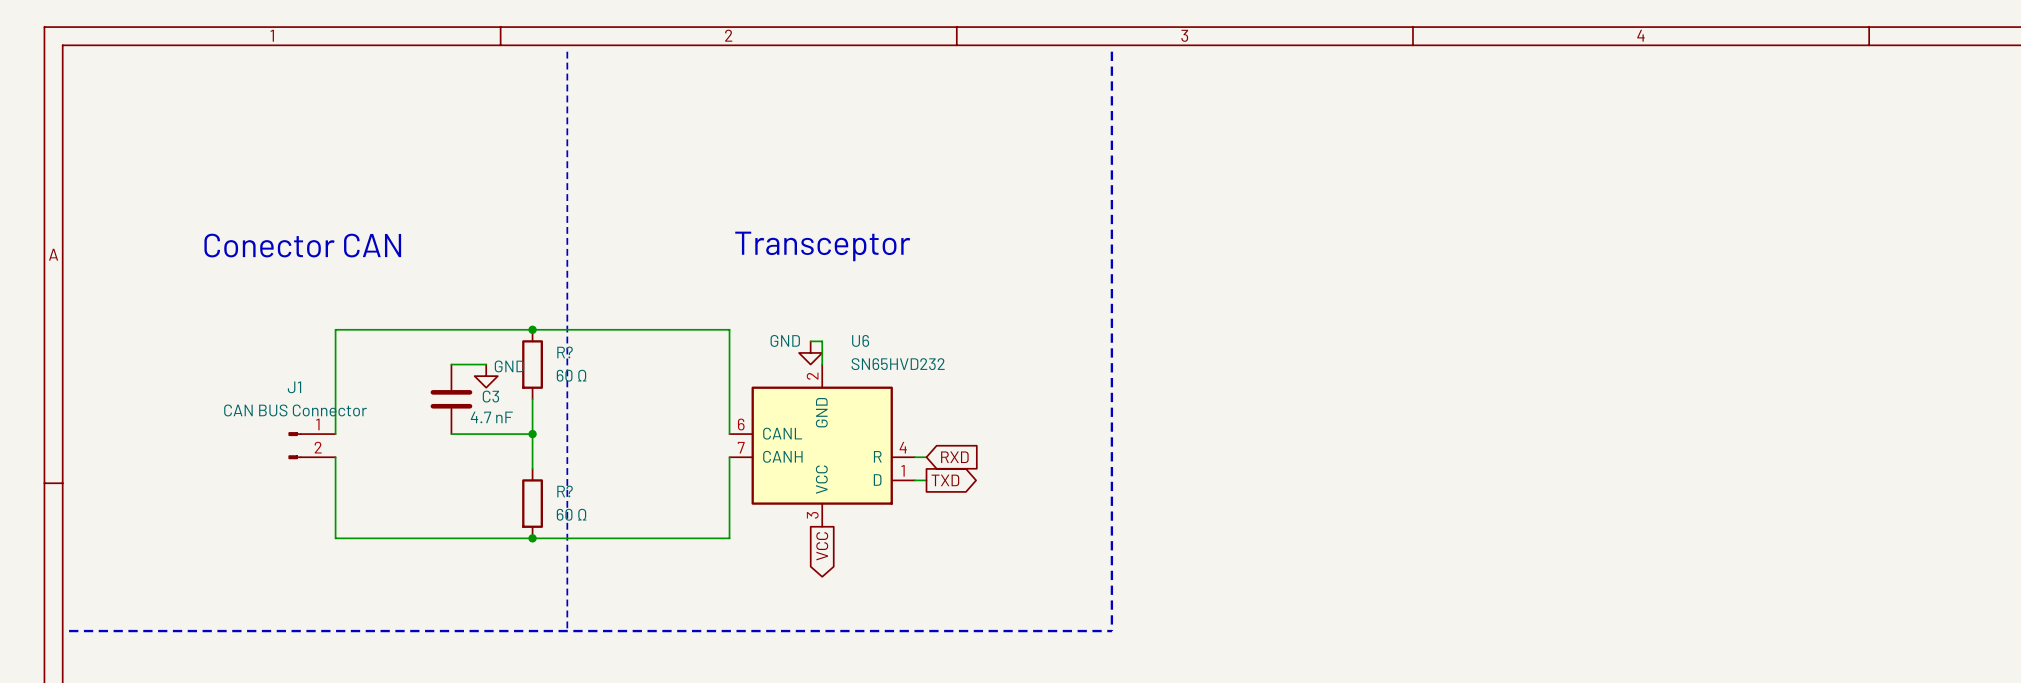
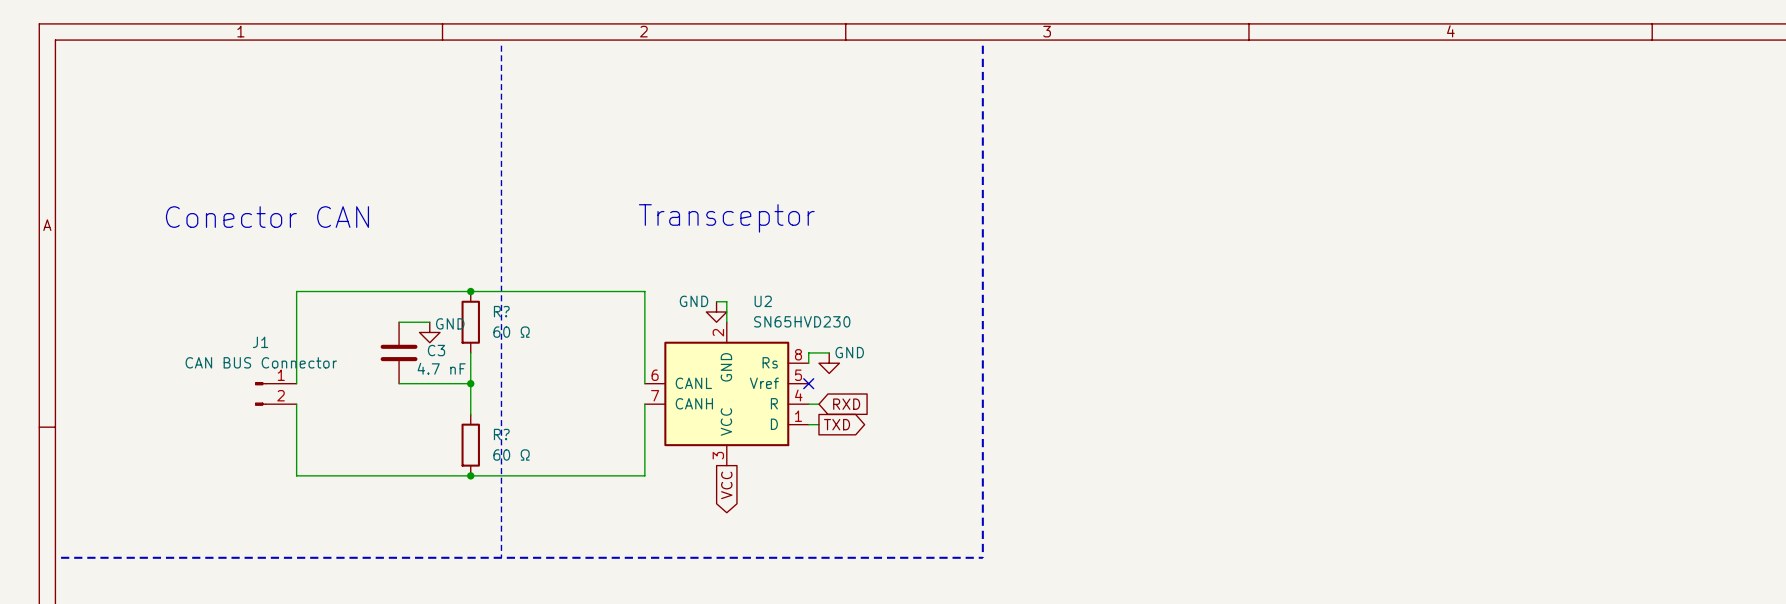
wire: none -> (829, 352) (808, 352) (808, 363)
power symbol: none -> GND (829, 363)
no-connect mark: none -> (808, 383)
U6: SN65HVD232 (822, 445) -> none
U2: none -> SN65HVD230 (726, 393)

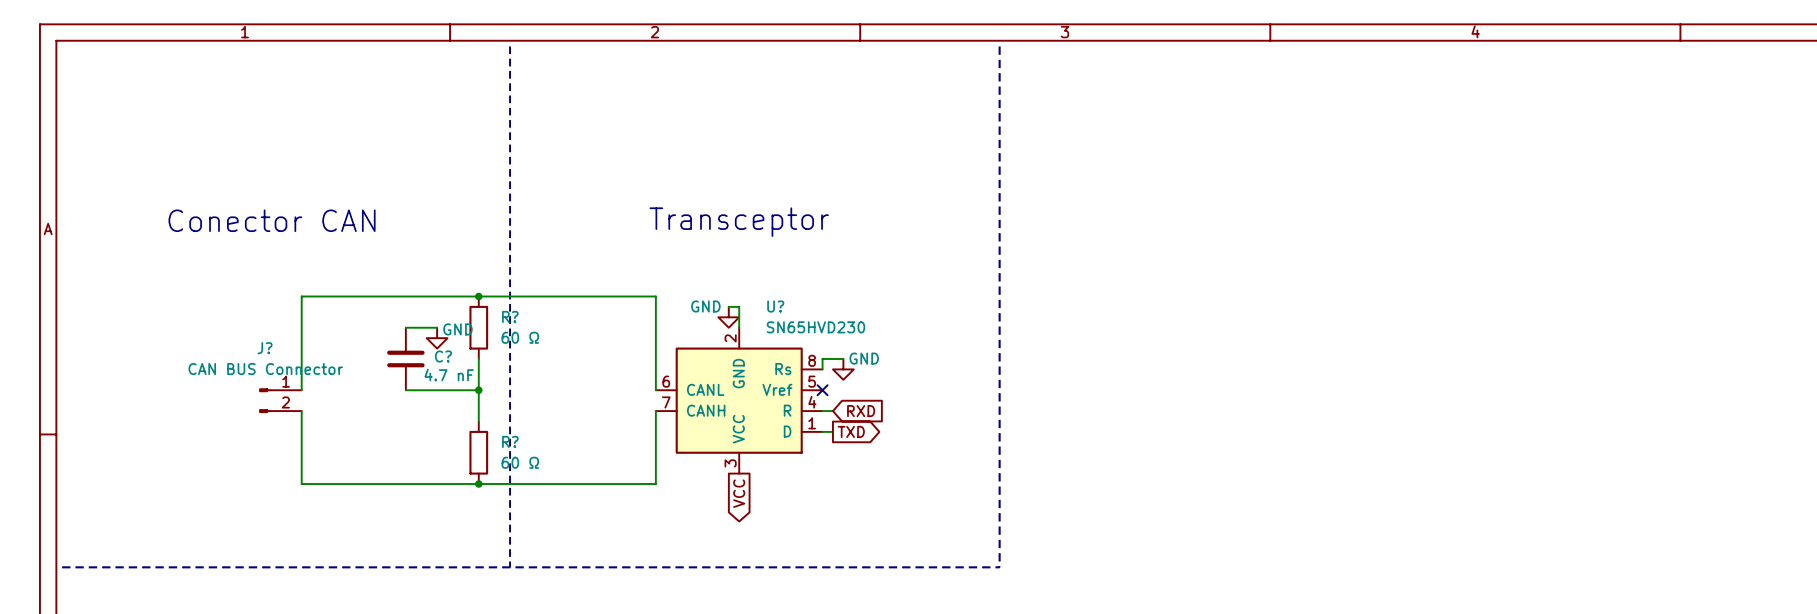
U2 name: U2 (763, 301) -> U? (775, 306)
J1 name: J1 (260, 342) -> J? (264, 348)
C3 name: C3 (436, 350) -> C? (443, 356)

